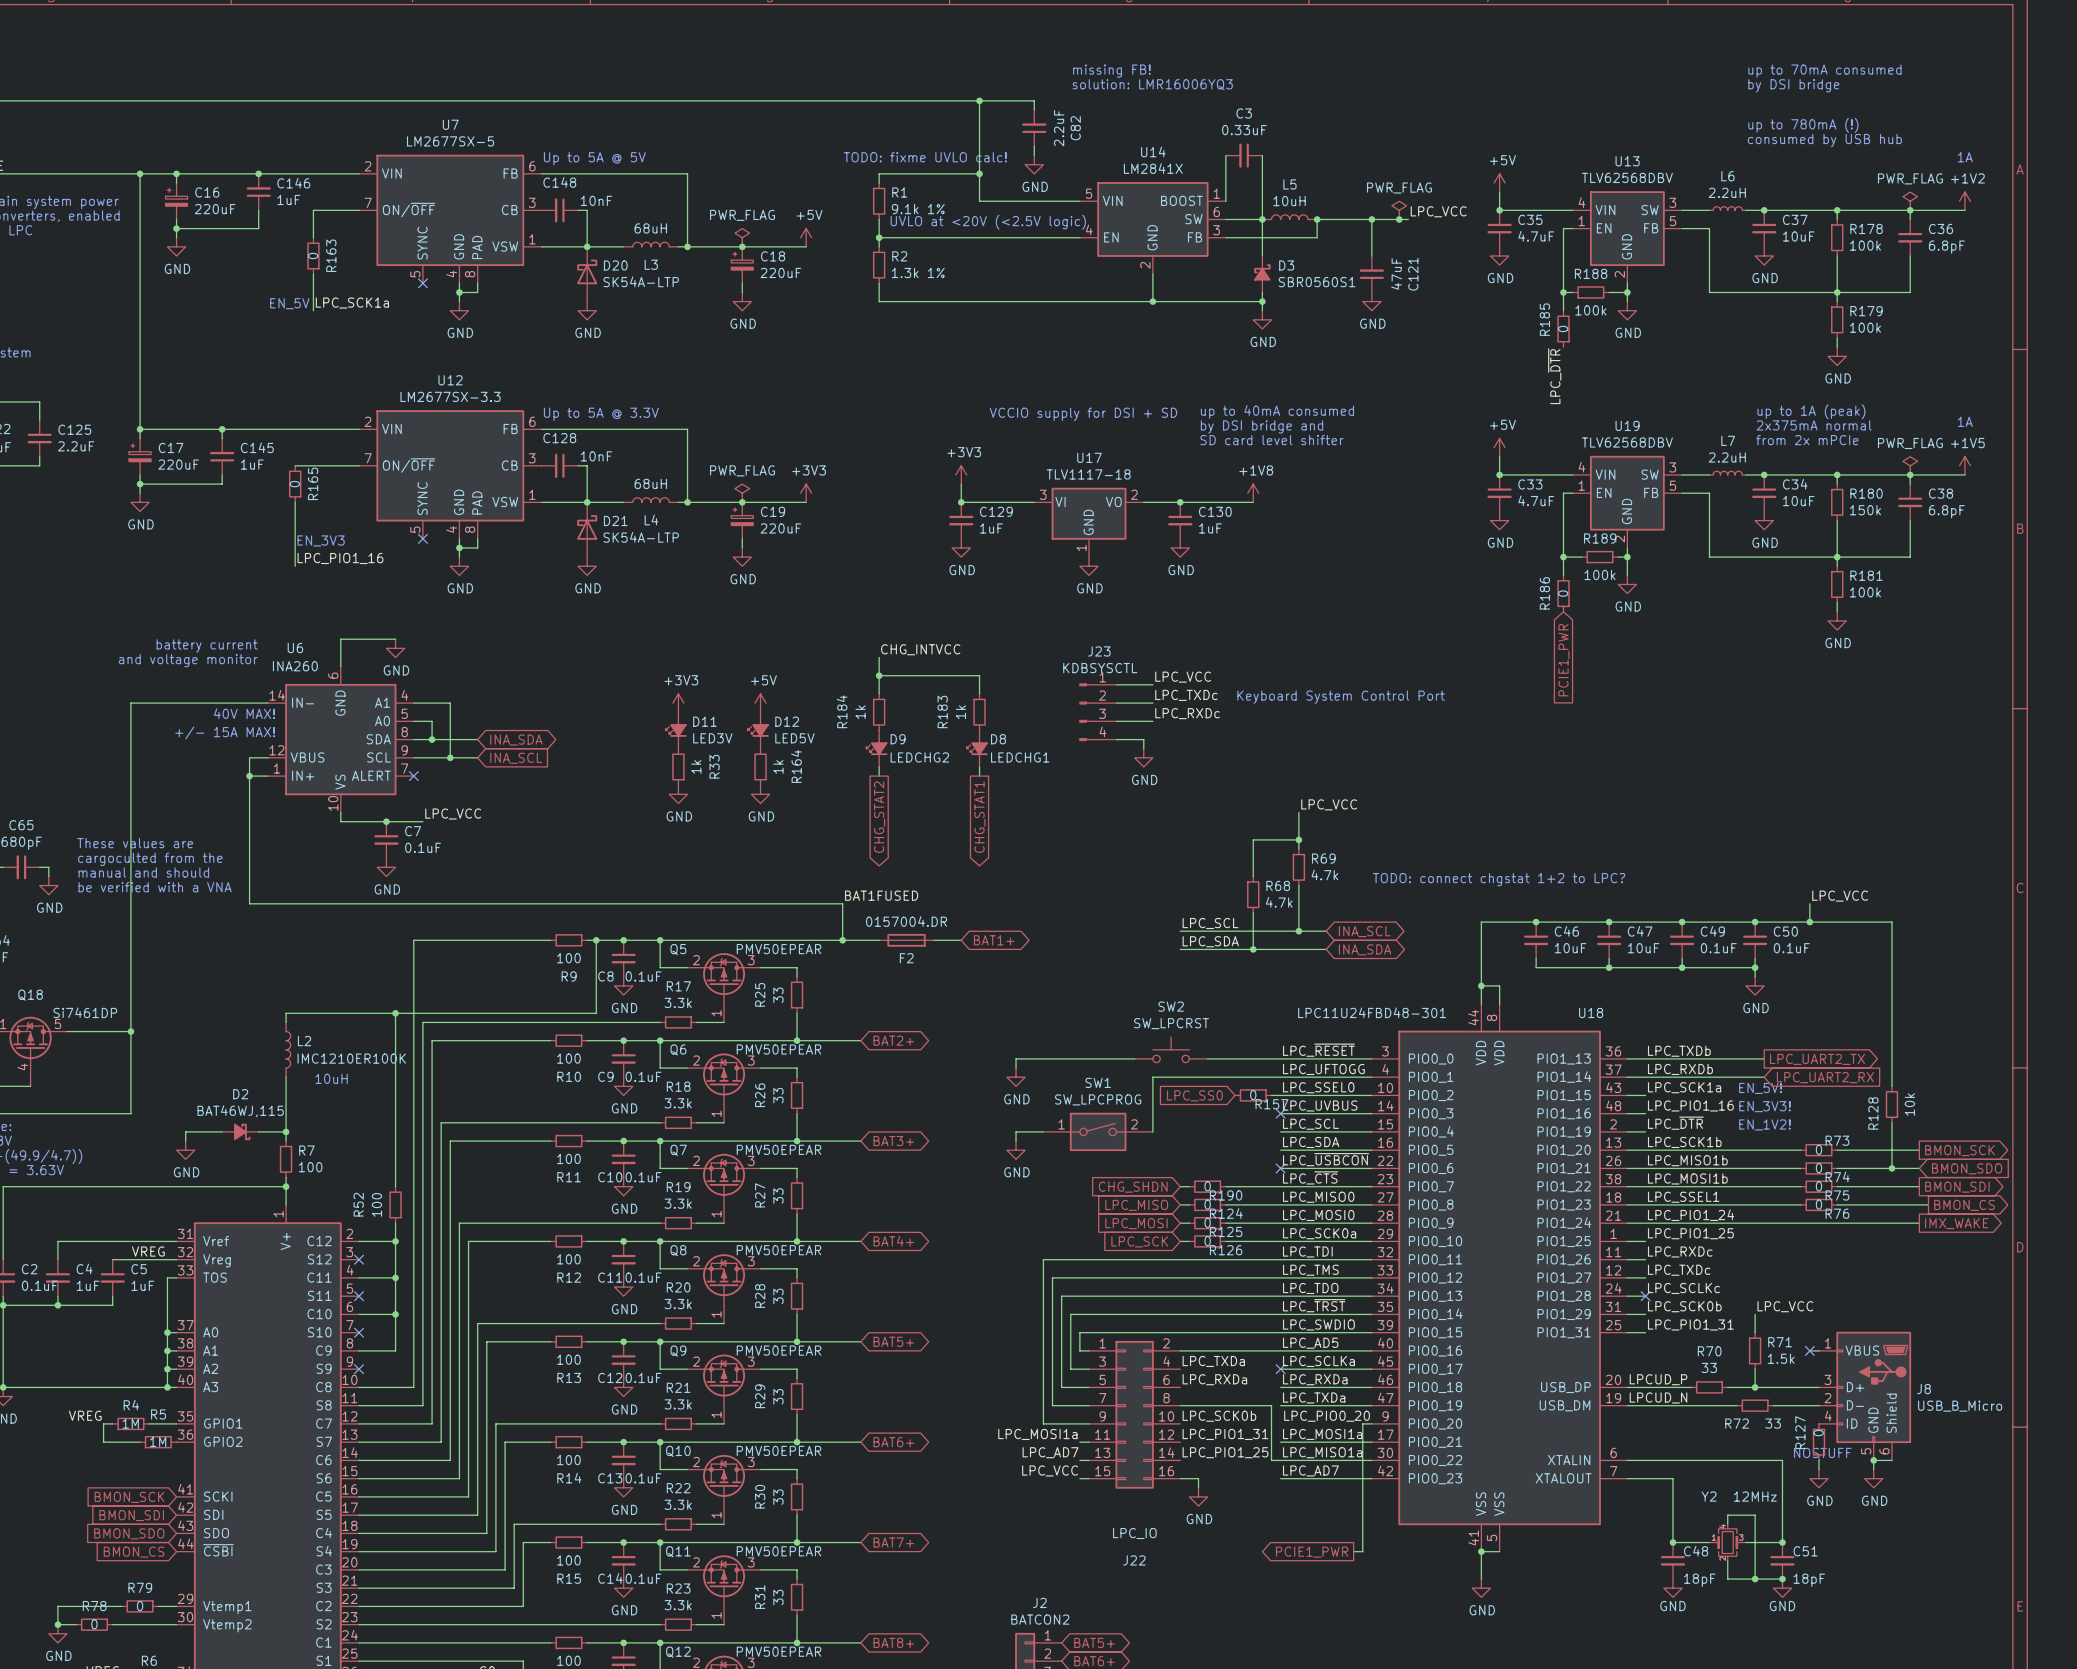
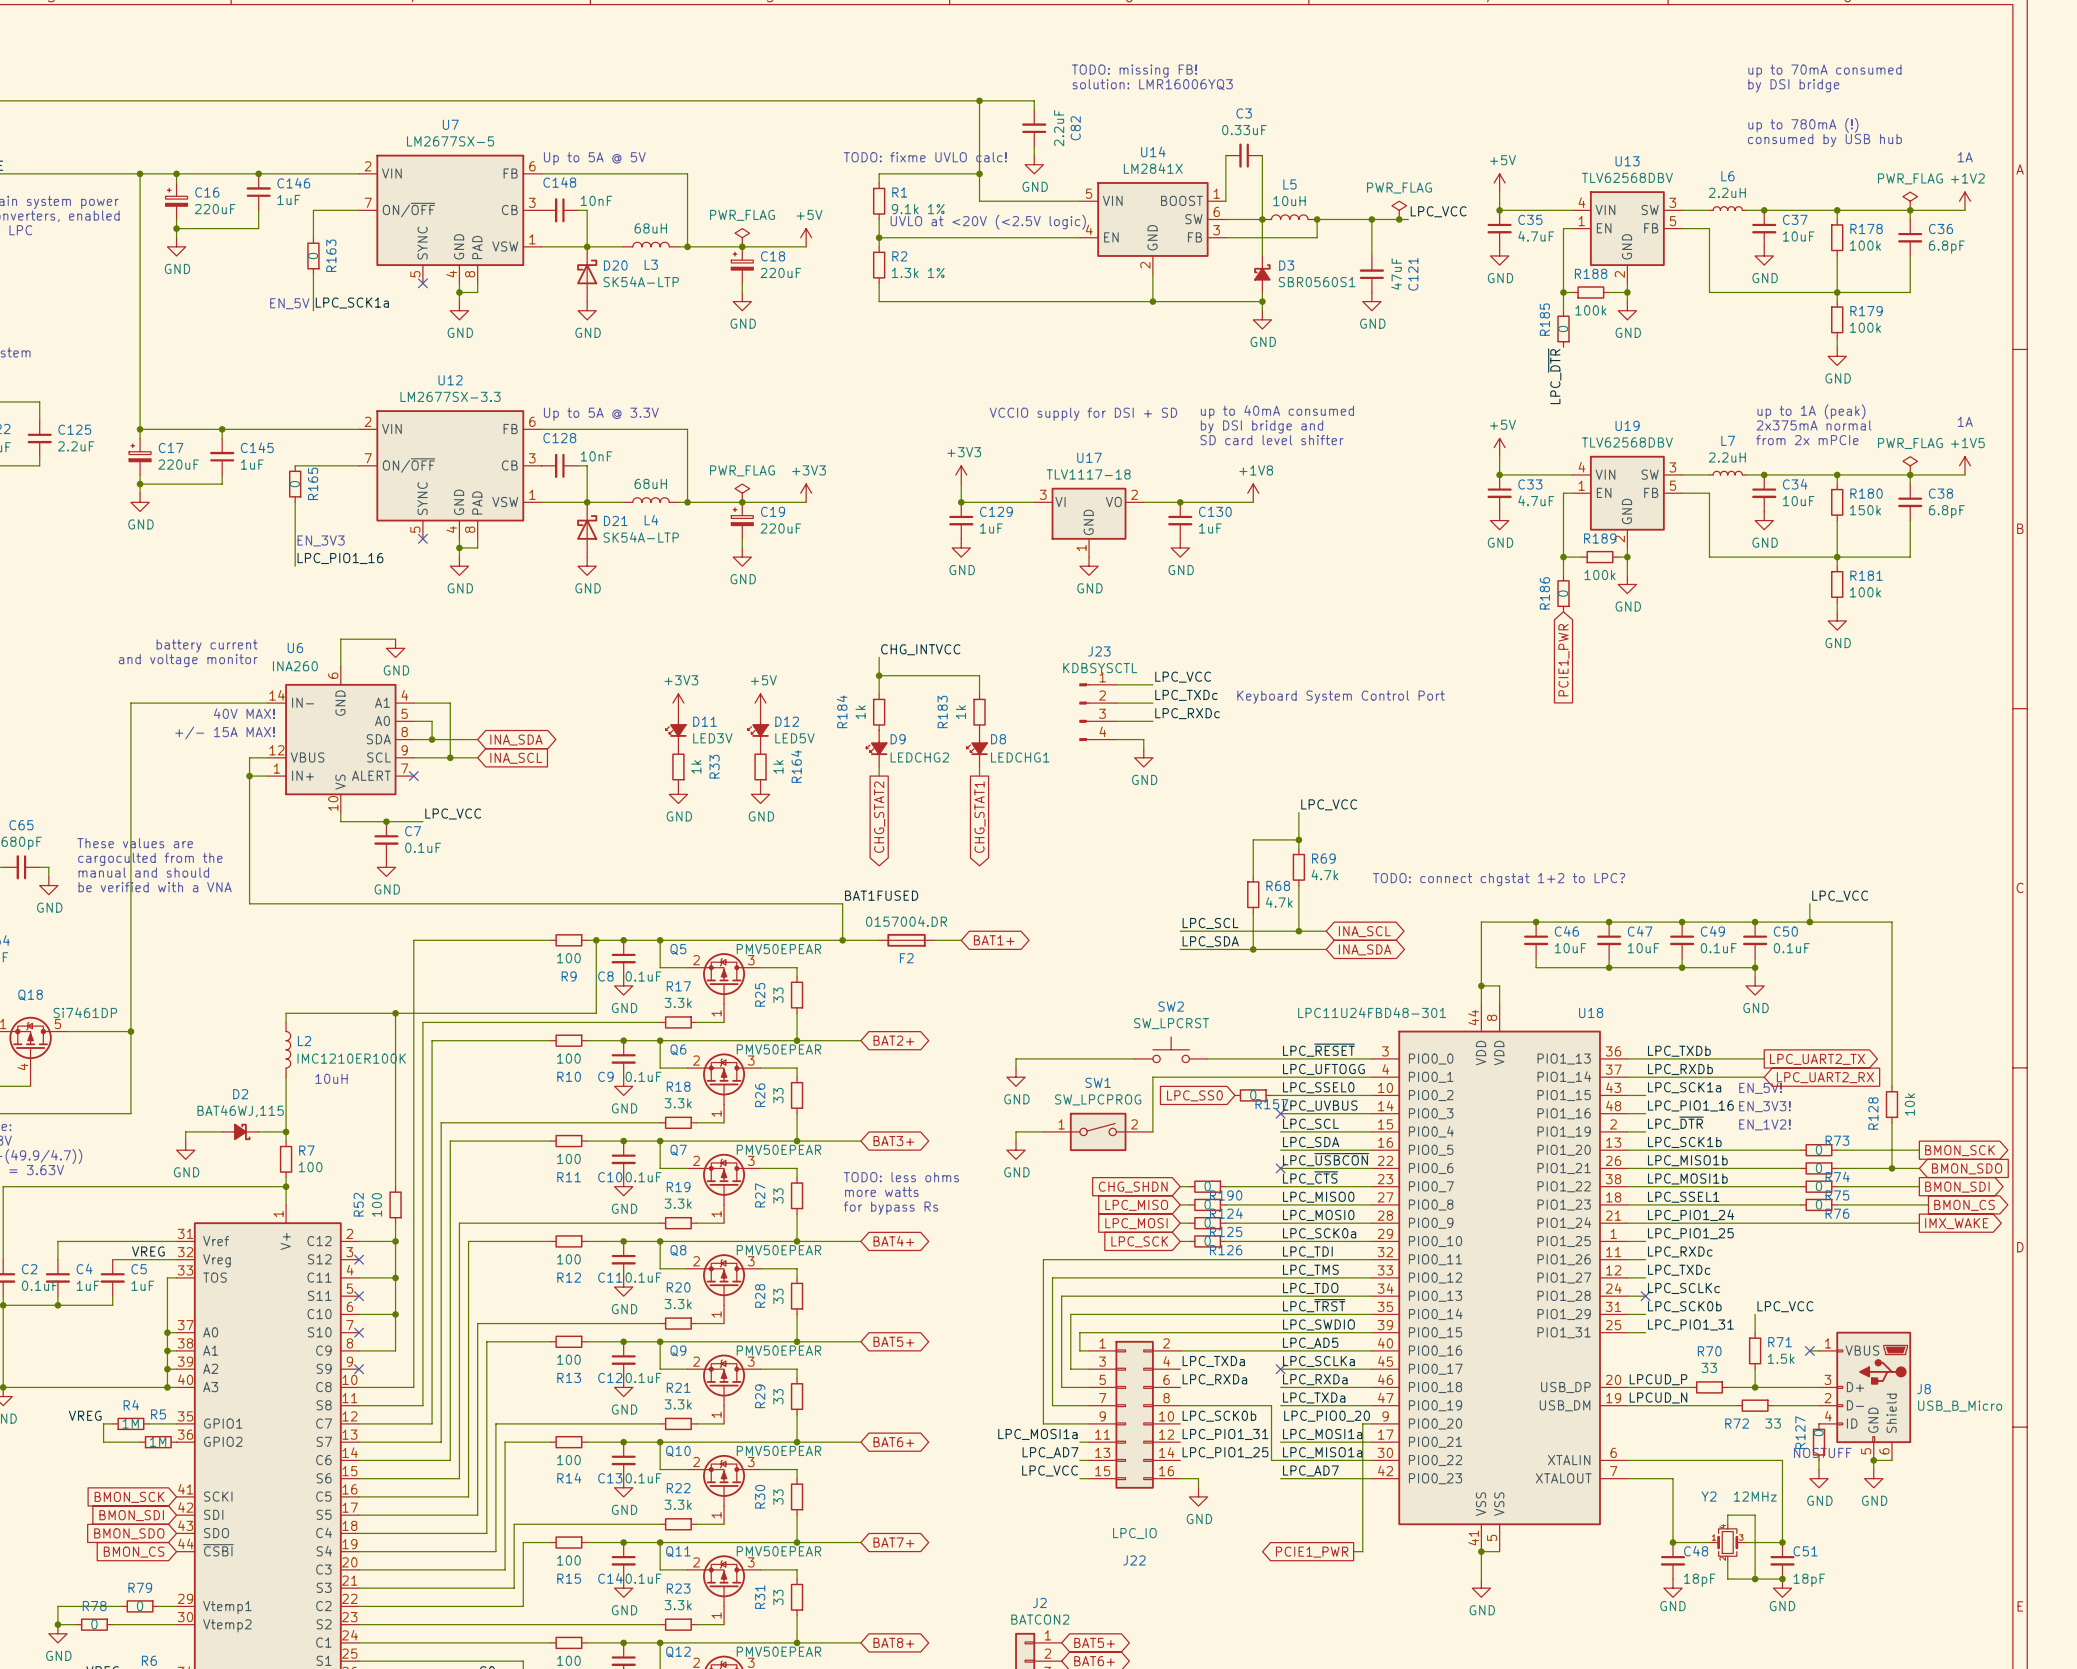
text: missing FB! (1111, 71) -> TODO: missing FB! (1134, 71)
text: none -> TODO: less ohms (901, 1177)
text: none -> more watts (881, 1191)
text: none -> for bypass Rs (890, 1208)

